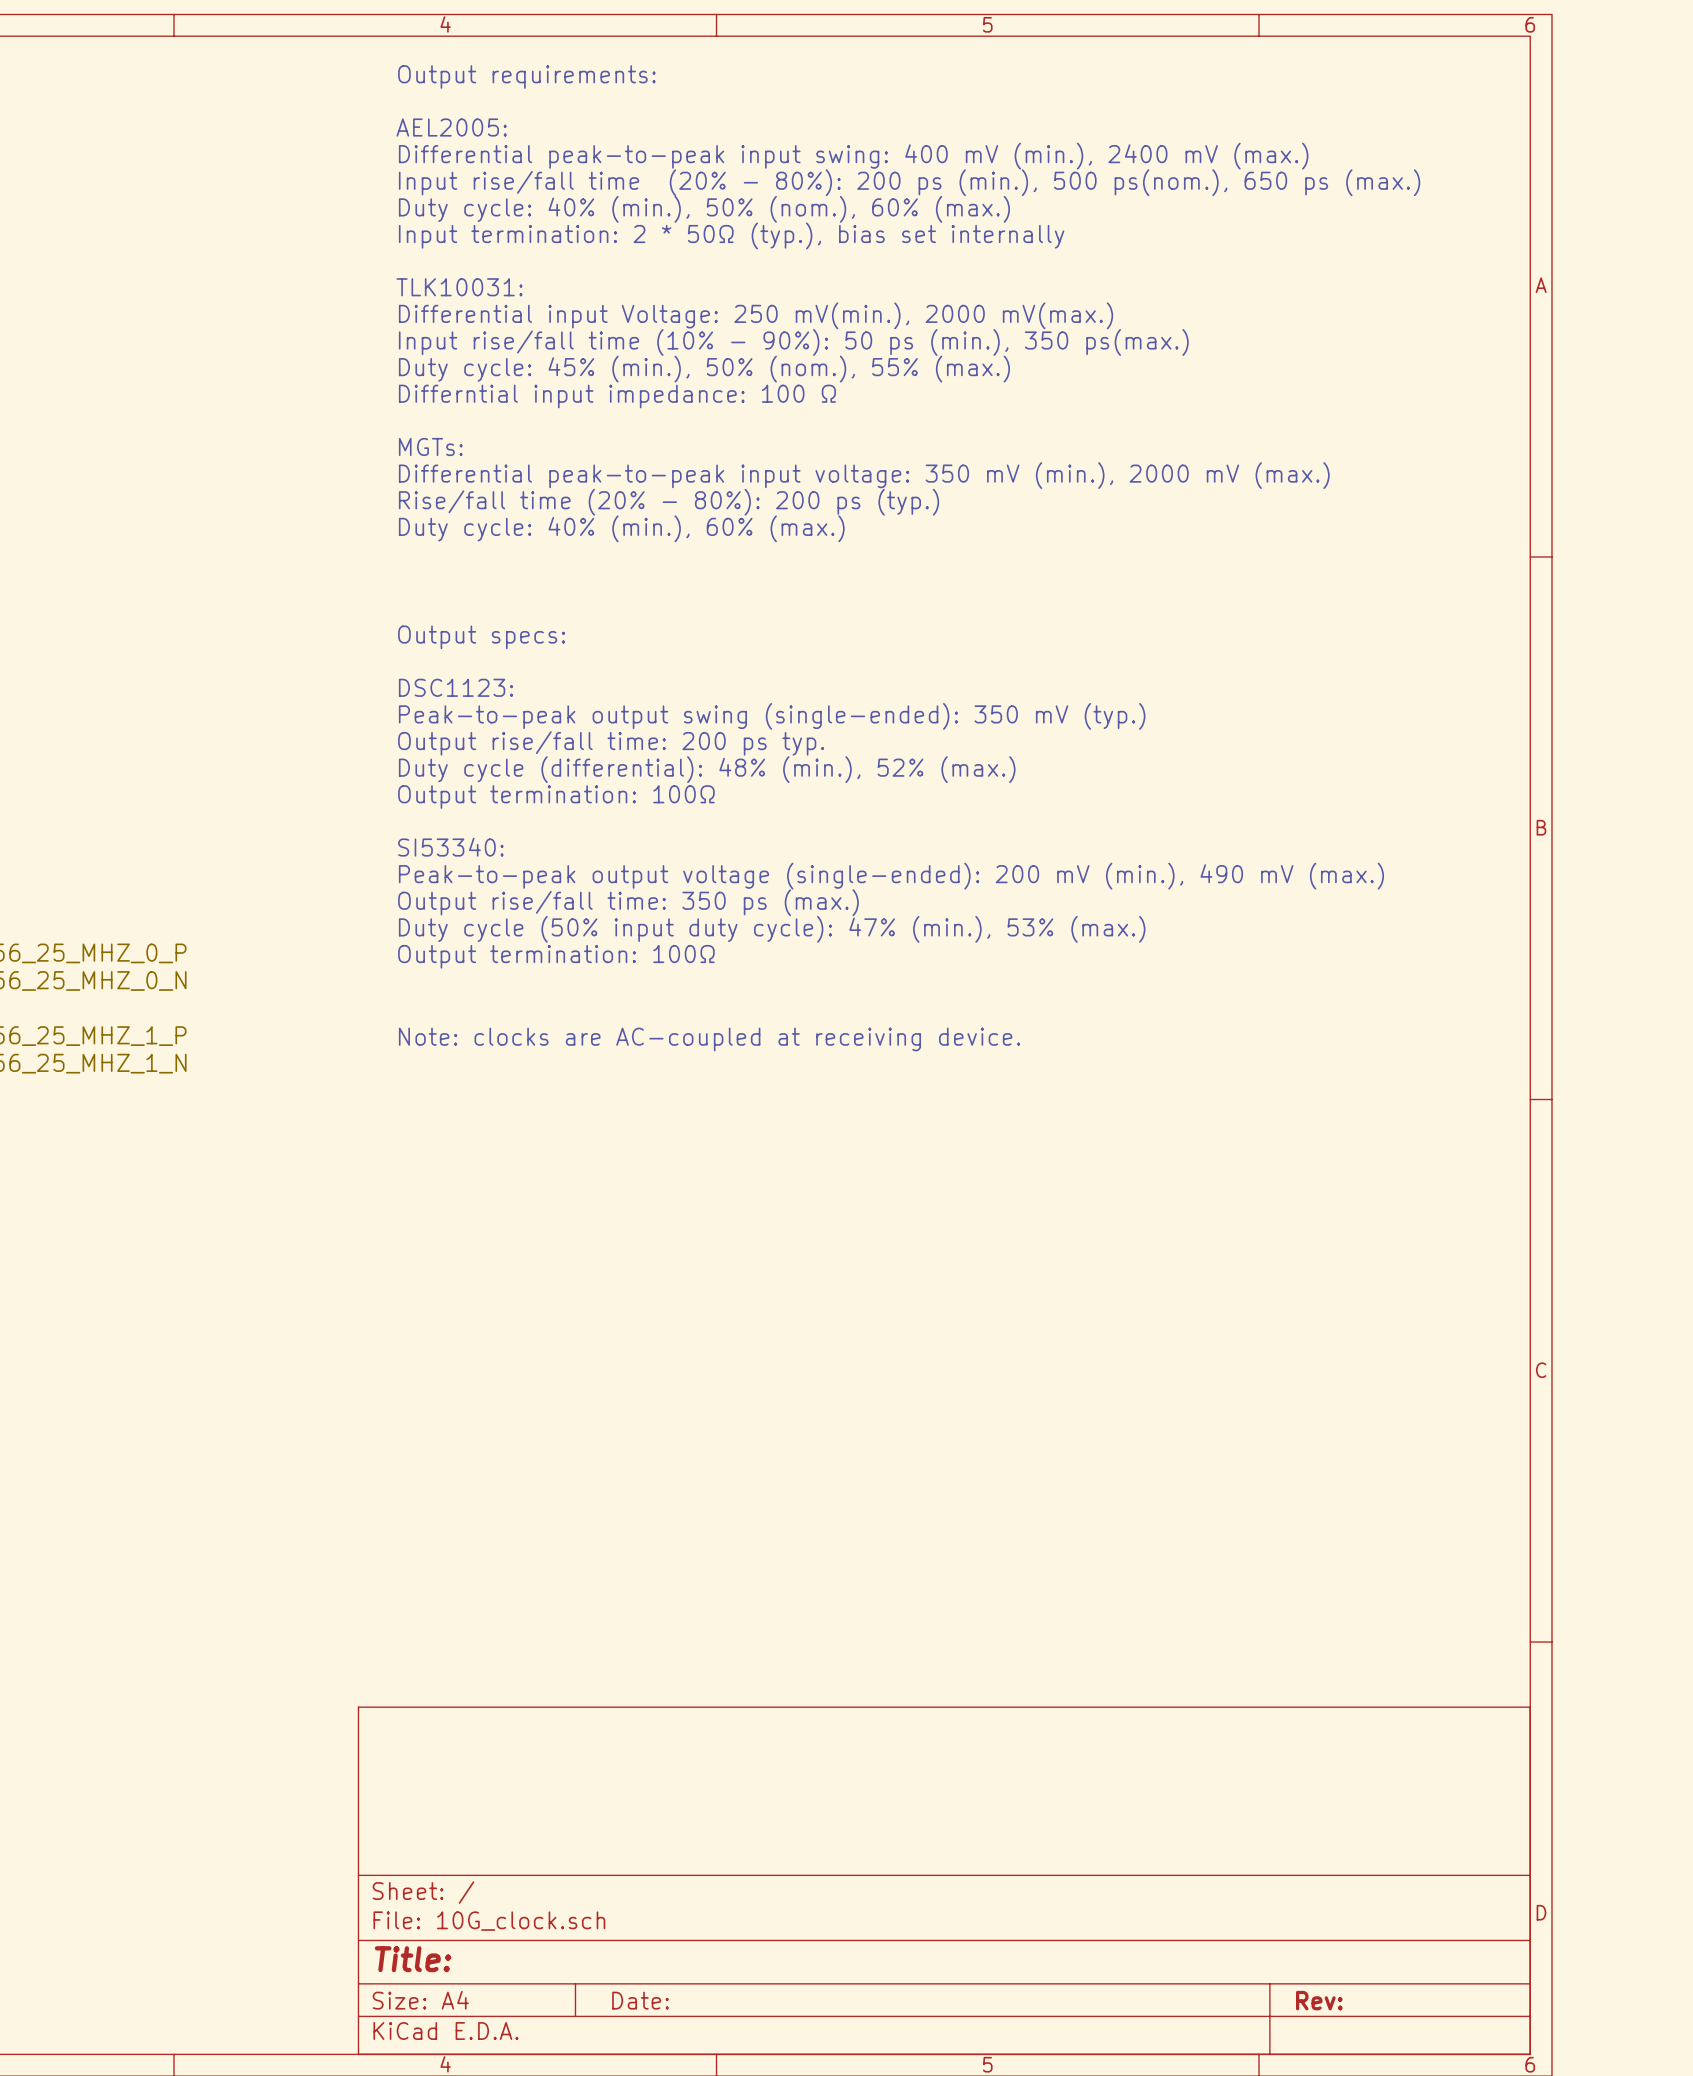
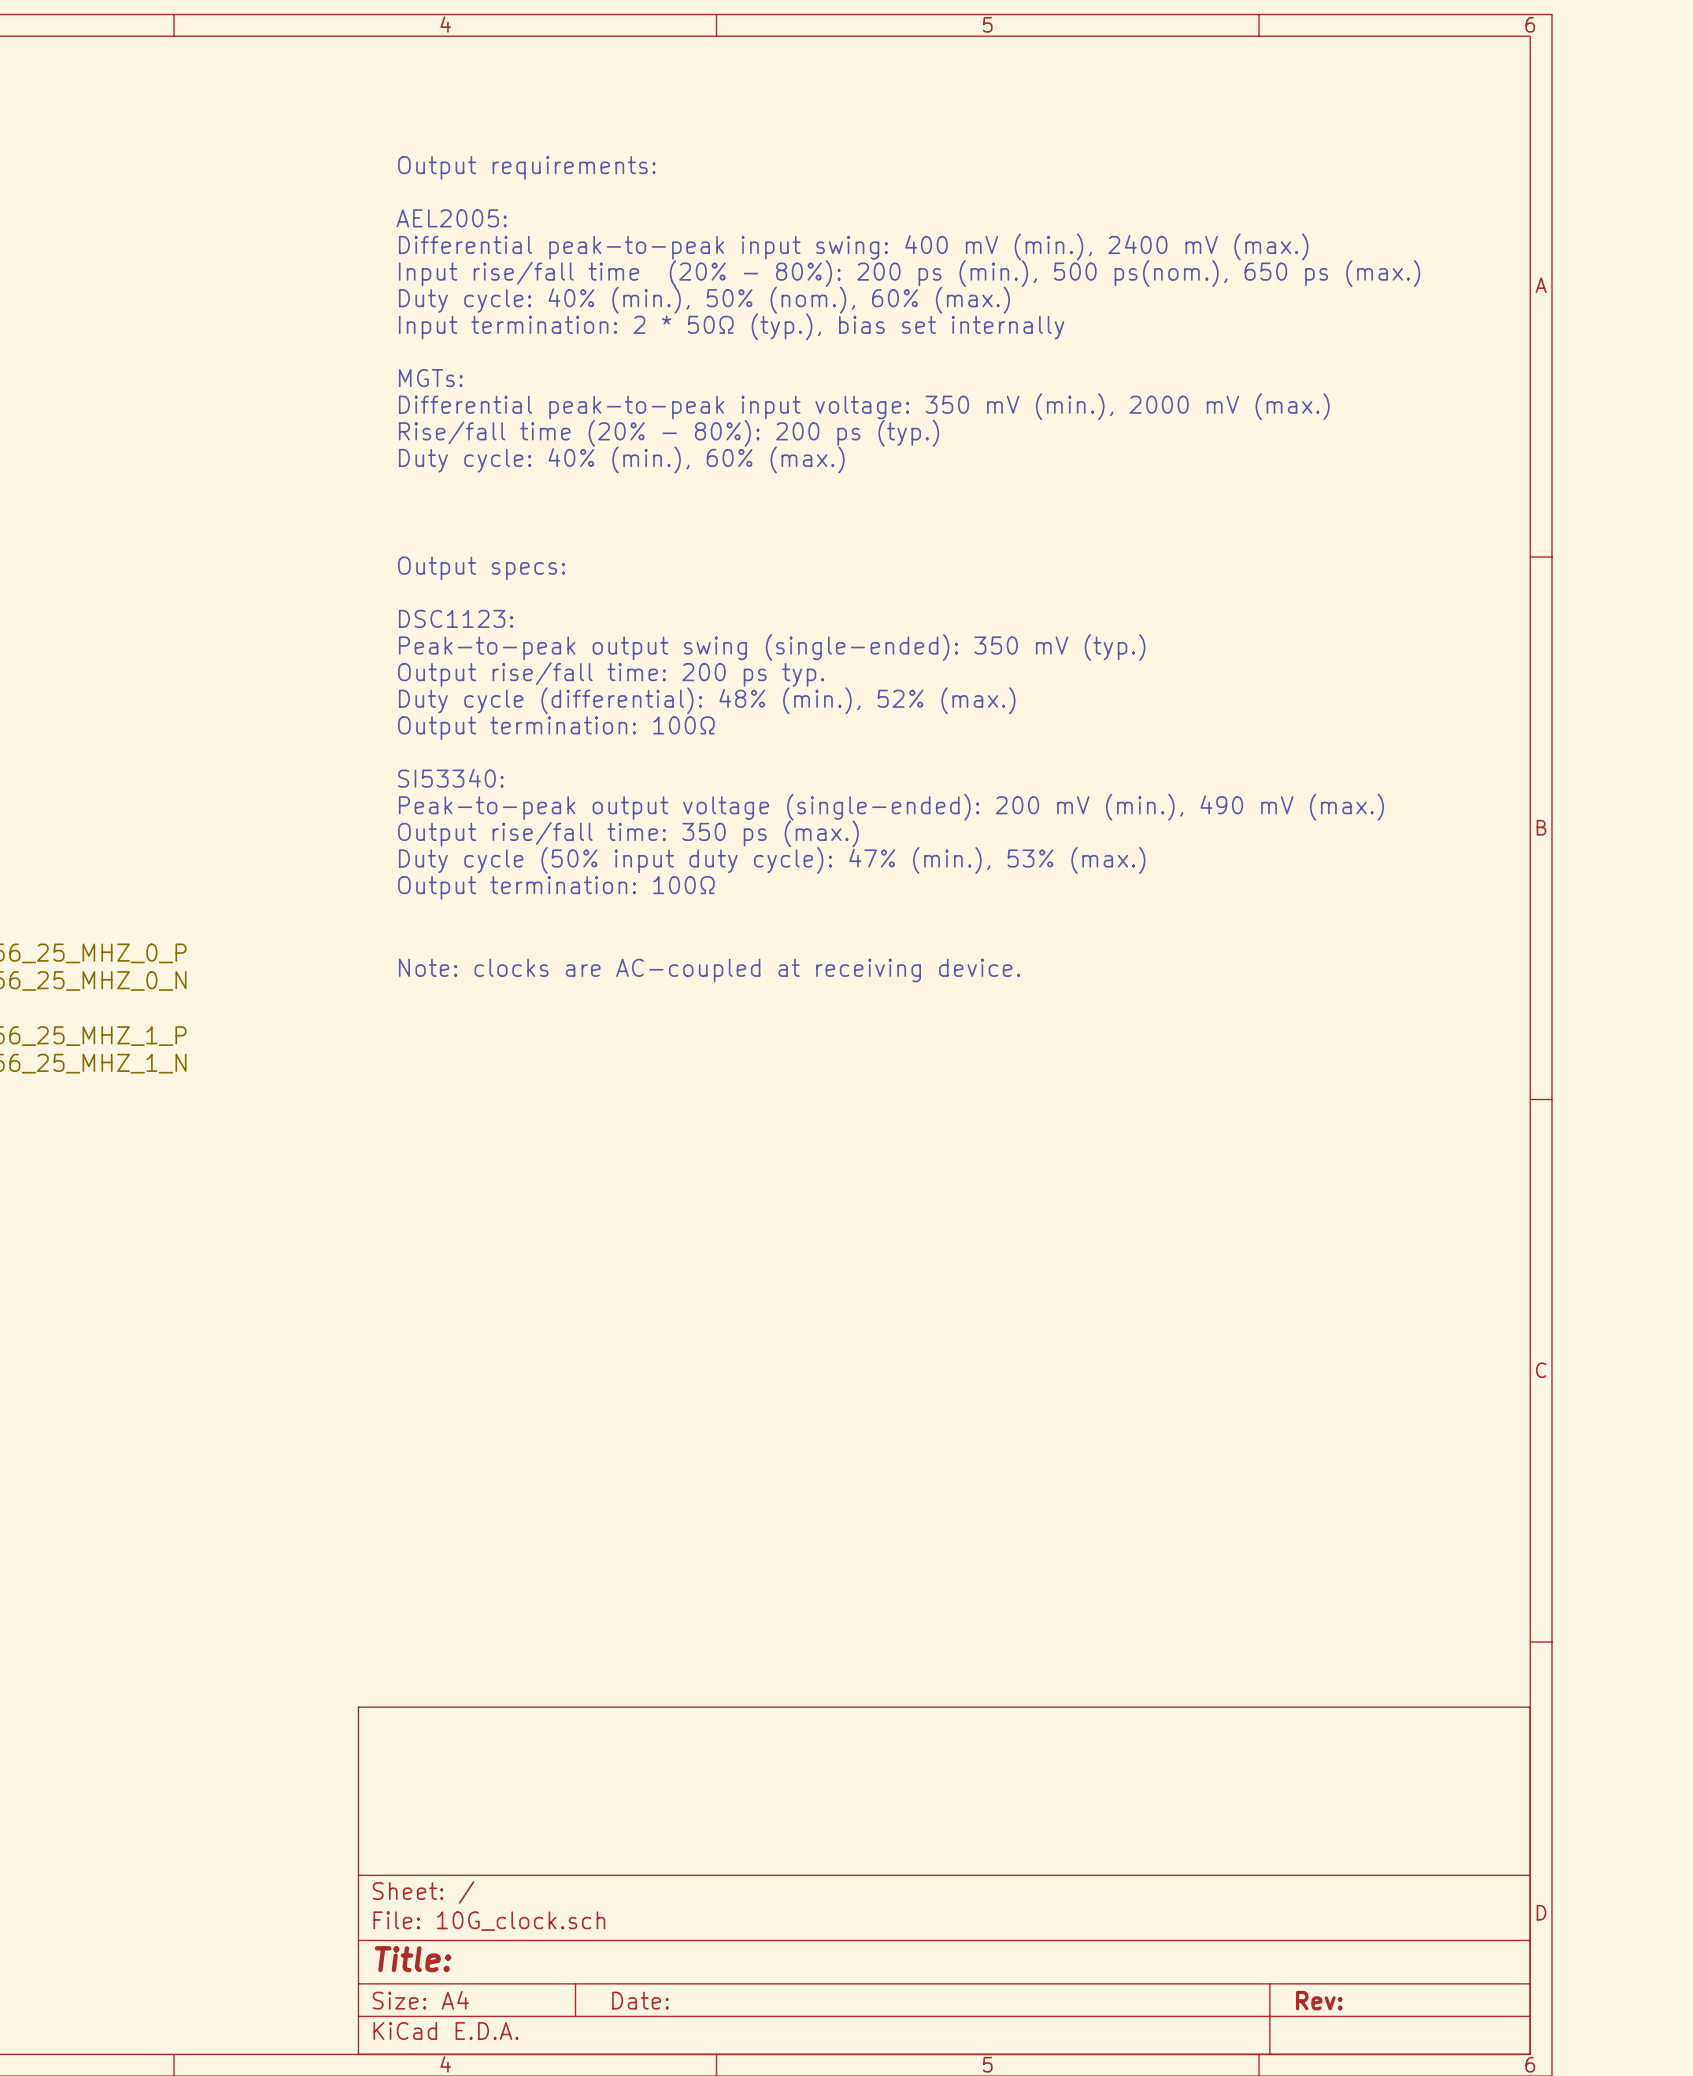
text position: Output requirements: (526, 77) -> Output requirements: (526, 167)
text position: AEL2005: (451, 127) -> AEL2005: (451, 218)
text position: Differential peak-to-peak input swing: 400 mV (min.), 2400 mV (max.) (853, 156) -> Differential peak-to-peak input swing: 400 mV (min.), 2400 mV (max.) (853, 246)
text position: Input rise/fall time (20% - 80%): 200 ps (min.), 500 ps(nom.), 650 ps (max.) (909, 182) -> Input rise/fall time (20% - 80%): 200 ps (min.), 500 ps(nom.), 650 ps (max.) (909, 273)
text position: Duty cycle: 40% (min.), 50% (nom.), 60% (max.) (704, 209) -> Duty cycle: 40% (min.), 50% (nom.), 60% (max.) (704, 300)
text position: Input termination: 2 * 50Ω (typ.), bias set internally (731, 235) -> Input termination: 2 * 50Ω (typ.), bias set internally (731, 326)
text: TLK10031: (459, 287) -> none
text: Differential input Voltage: 250 mV(min.), 2000 mV(max.) (756, 315) -> none
text: Input rise/fall time (10% - 90%): 50 ps (min.), 350 ps(max.) (793, 342) -> none
text: Duty cycle: 45% (min.), 50% (nom.), 55% (max.) (704, 369) -> none
text: Differntial input impedance: 100 Ω (617, 396) -> none
text position: MGTs: (430, 446) -> MGTs: (430, 378)
text position: Differential peak-to-peak input voltage: 350 mV (min.), 2000 mV (max.) (864, 475) -> Differential peak-to-peak input voltage: 350 mV (min.), 2000 mV (max.) (864, 406)
text position: Rise/fall time (20% - 80%): 200 ps (typ.) (669, 502) -> Rise/fall time (20% - 80%): 200 ps (typ.) (669, 433)
text position: Duty cycle: 40% (min.), 60% (max.) (621, 528) -> Duty cycle: 40% (min.), 60% (max.) (621, 459)
text position: Output specs: (481, 637) -> Output specs: (481, 568)
text position: DSC1123: (456, 687) -> DSC1123: (456, 618)
text position: Peak-to-peak output swing (single-ended): 350 mV (typ.) (772, 716) -> Peak-to-peak output swing (single-ended): 350 mV (typ.) (772, 647)
text: none -> Output termination: 100Ω (556, 728)
text position: Output rise/fall time: 200 ps typ. (611, 743) -> Output rise/fall time: 200 ps typ. (611, 674)
text position: Duty cycle (differential): 48% (min.), 52% (max.) (707, 769) -> Duty cycle (differential): 48% (min.), 52% (max.) (707, 700)
text: Output termination: 100Ω (556, 797) -> none
text position: SI53340: (450, 847) -> SI53340: (450, 778)
text position: Peak-to-peak output voltage (single-ended): 200 mV (min.), 490 mV (max.) (891, 876) -> Peak-to-peak output voltage (single-ended): 200 mV (min.), 490 mV (max.) (891, 807)
text: none -> Output termination: 100Ω (556, 887)
text position: Output rise/fall time: 350 ps (max.) (628, 902) -> Output rise/fall time: 350 ps (max.) (628, 833)
text position: Duty cycle (50% input duty cycle): 47% (min.), 53% (max.) (772, 929) -> Duty cycle (50% input duty cycle): 47% (min.), 53% (max.) (772, 860)
text: Output termination: 100Ω (556, 956) -> none
text position: Note: clocks are AC-coupled at receiving device. (709, 1039) -> Note: clocks are AC-coupled at receiving device. (709, 970)

